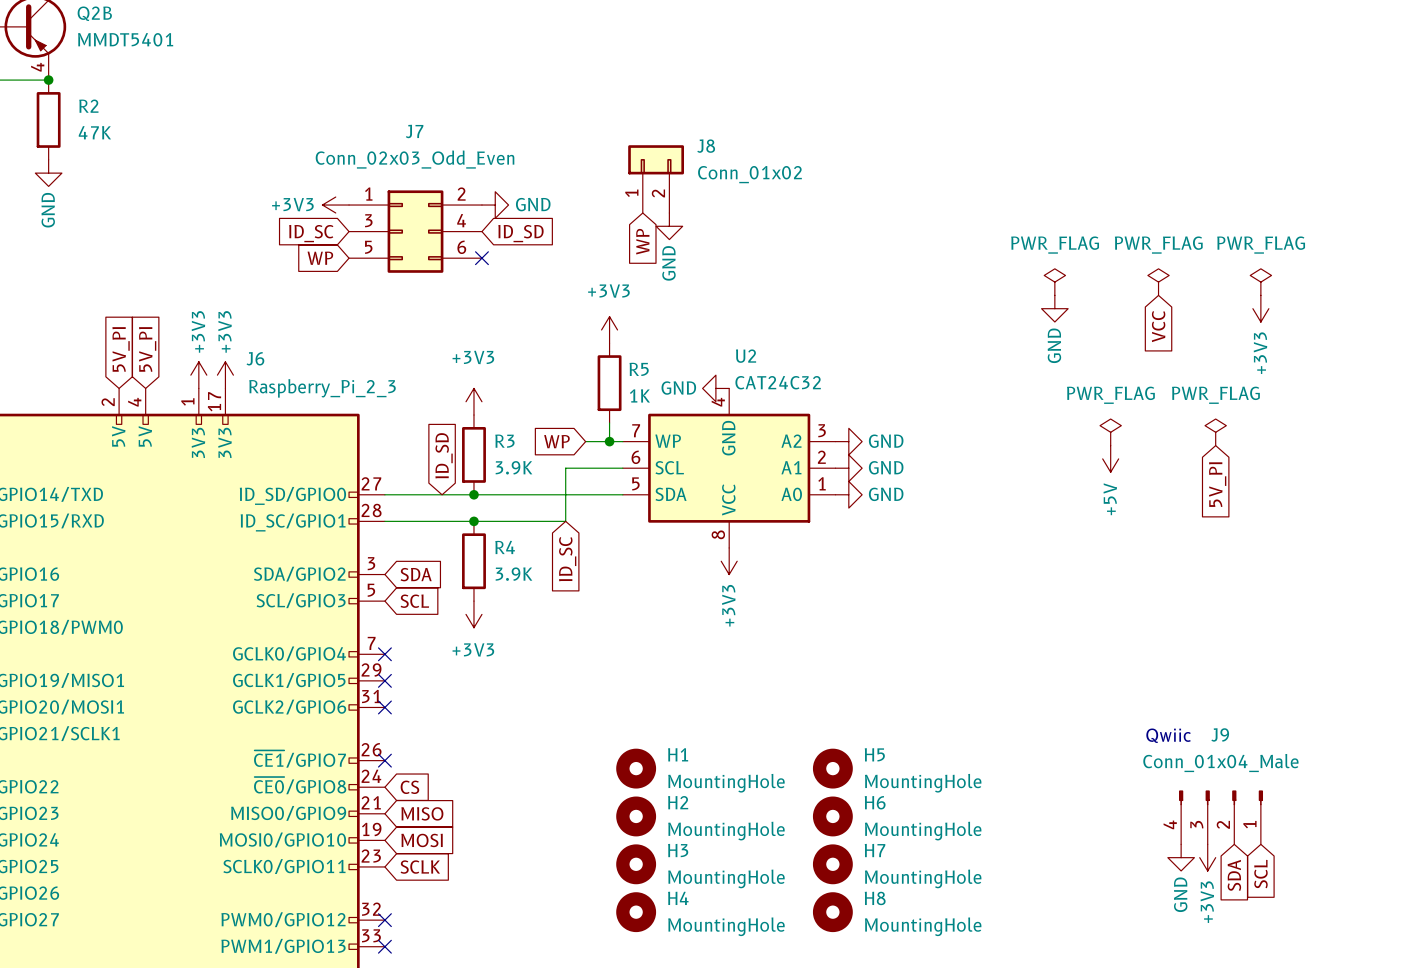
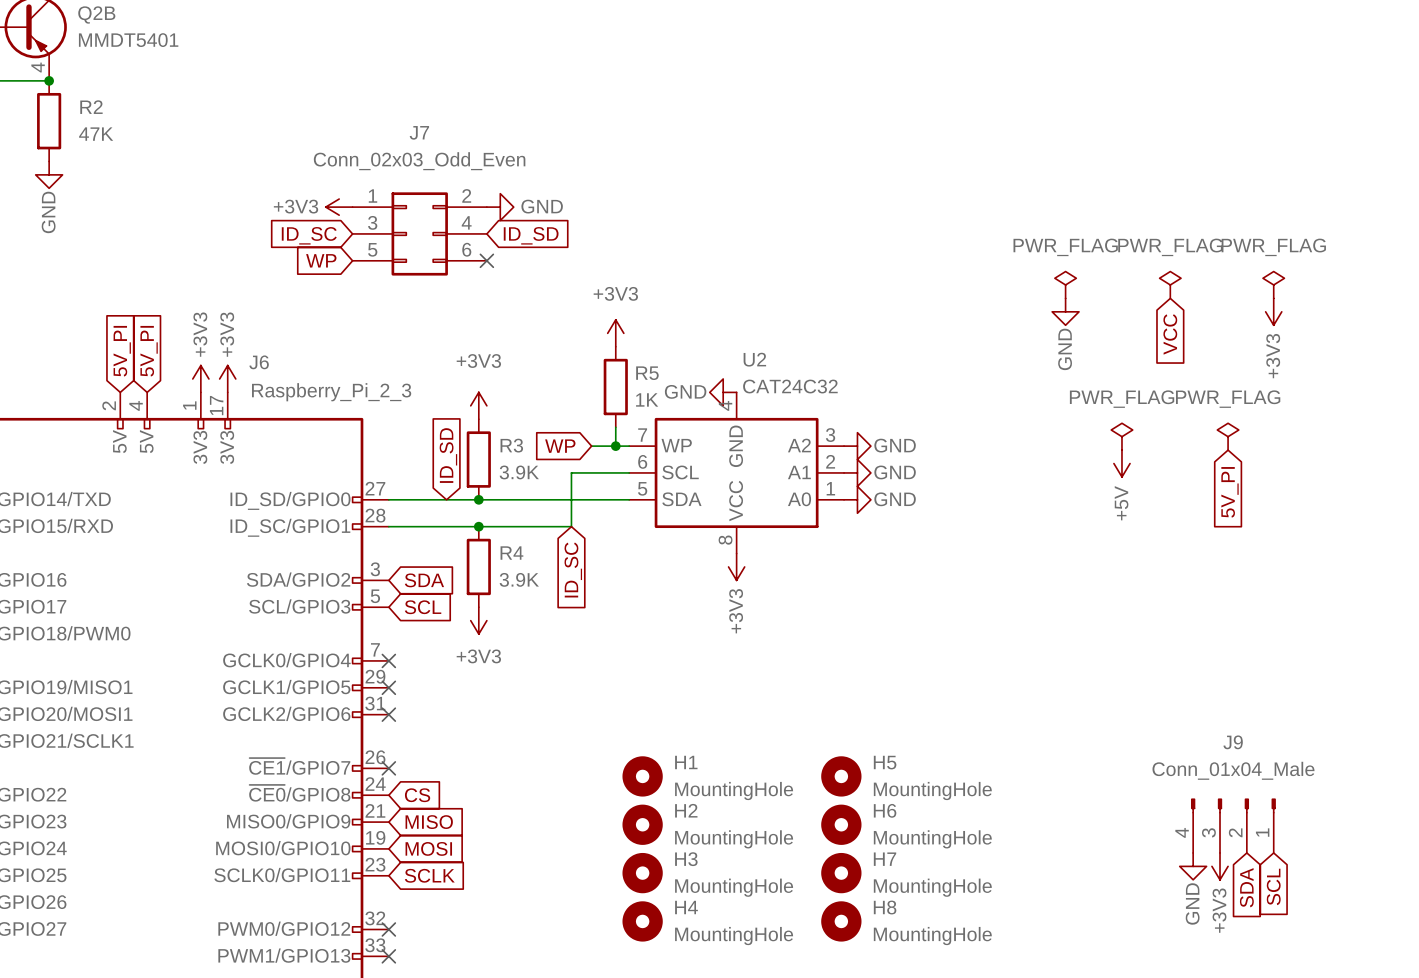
J8: Conn_01x02 (656, 179) -> none
power symbol: GND (669, 226) -> none
global label: WP (642, 241) -> none
text: Qwiic (1168, 735) -> none

